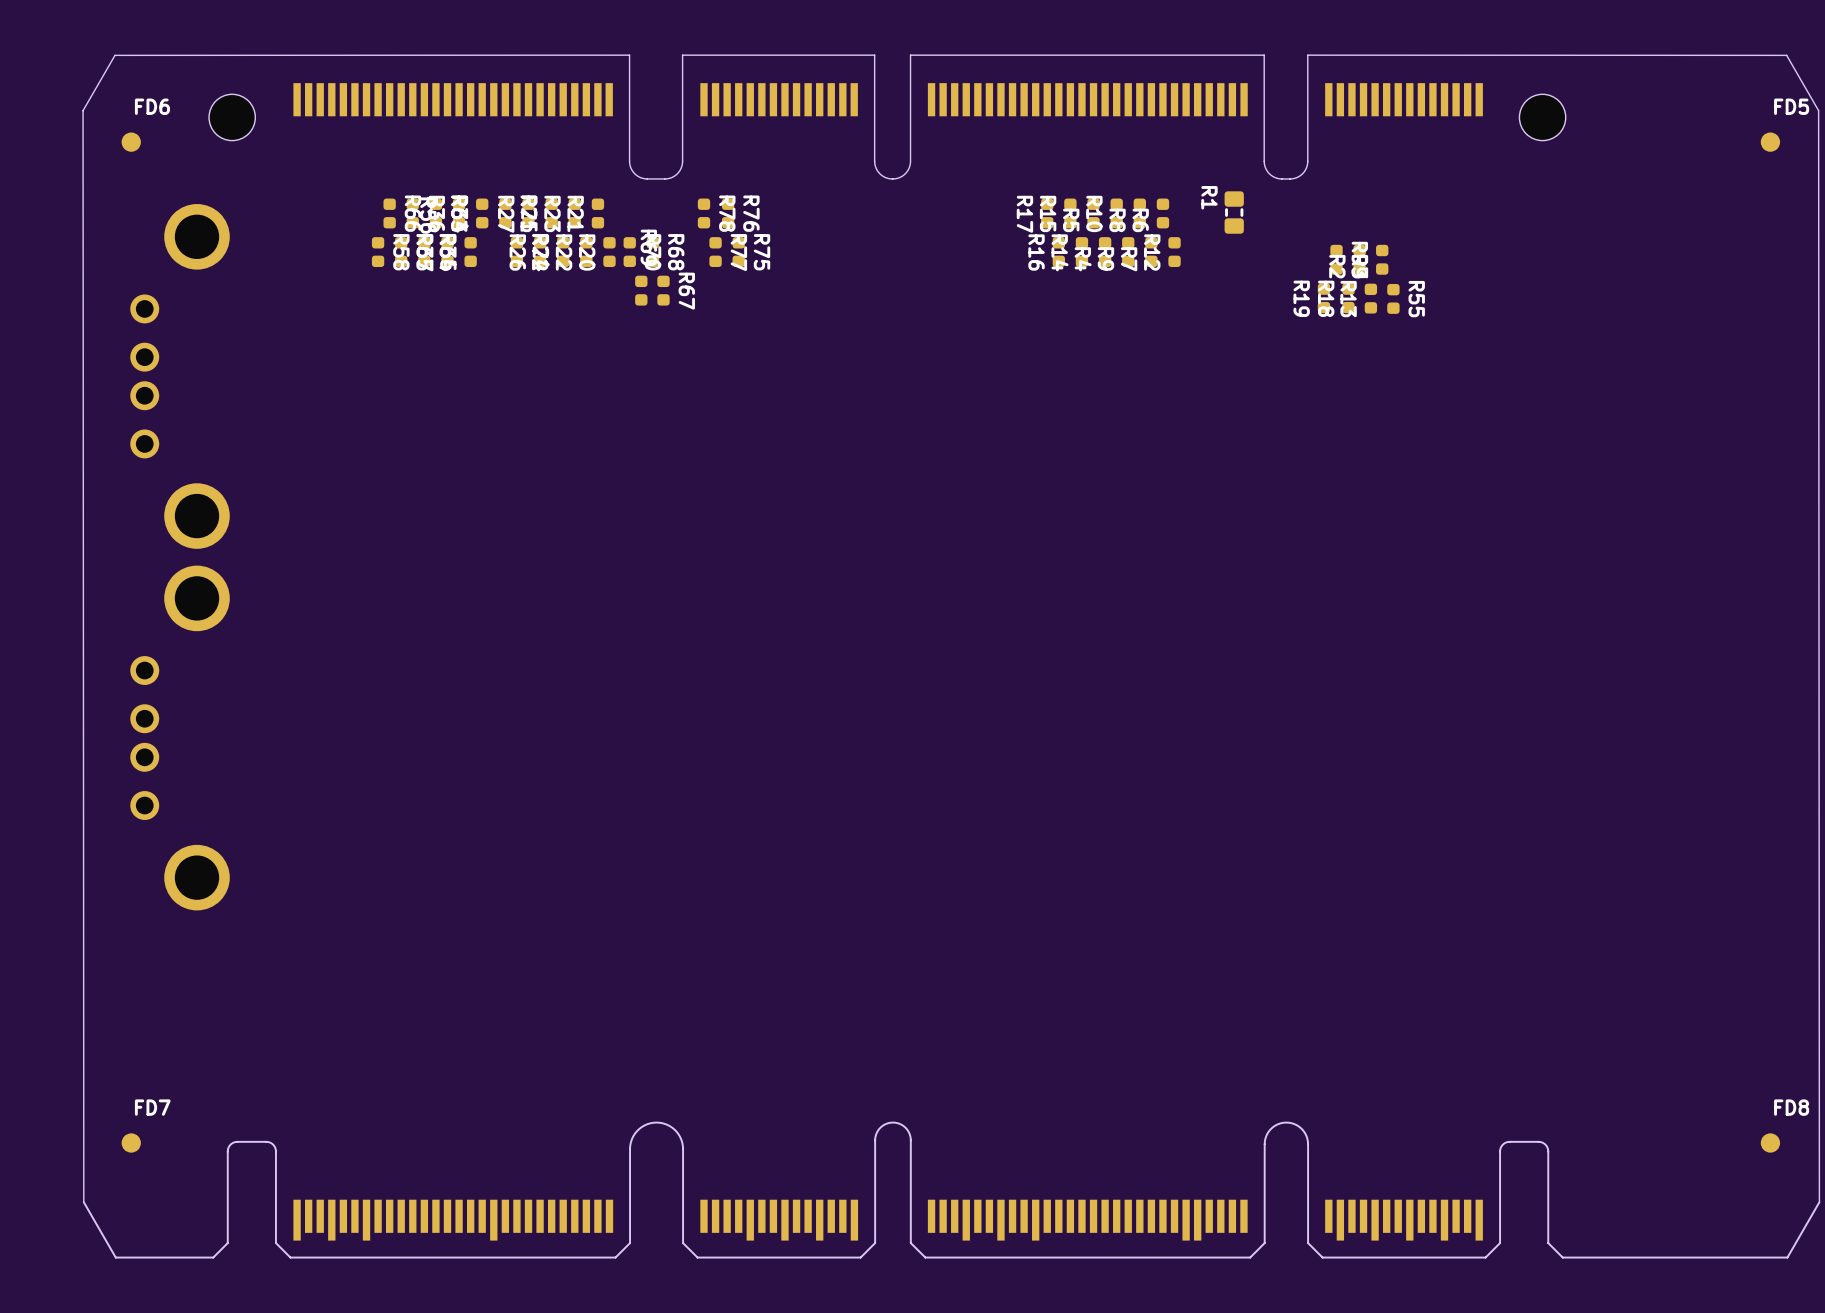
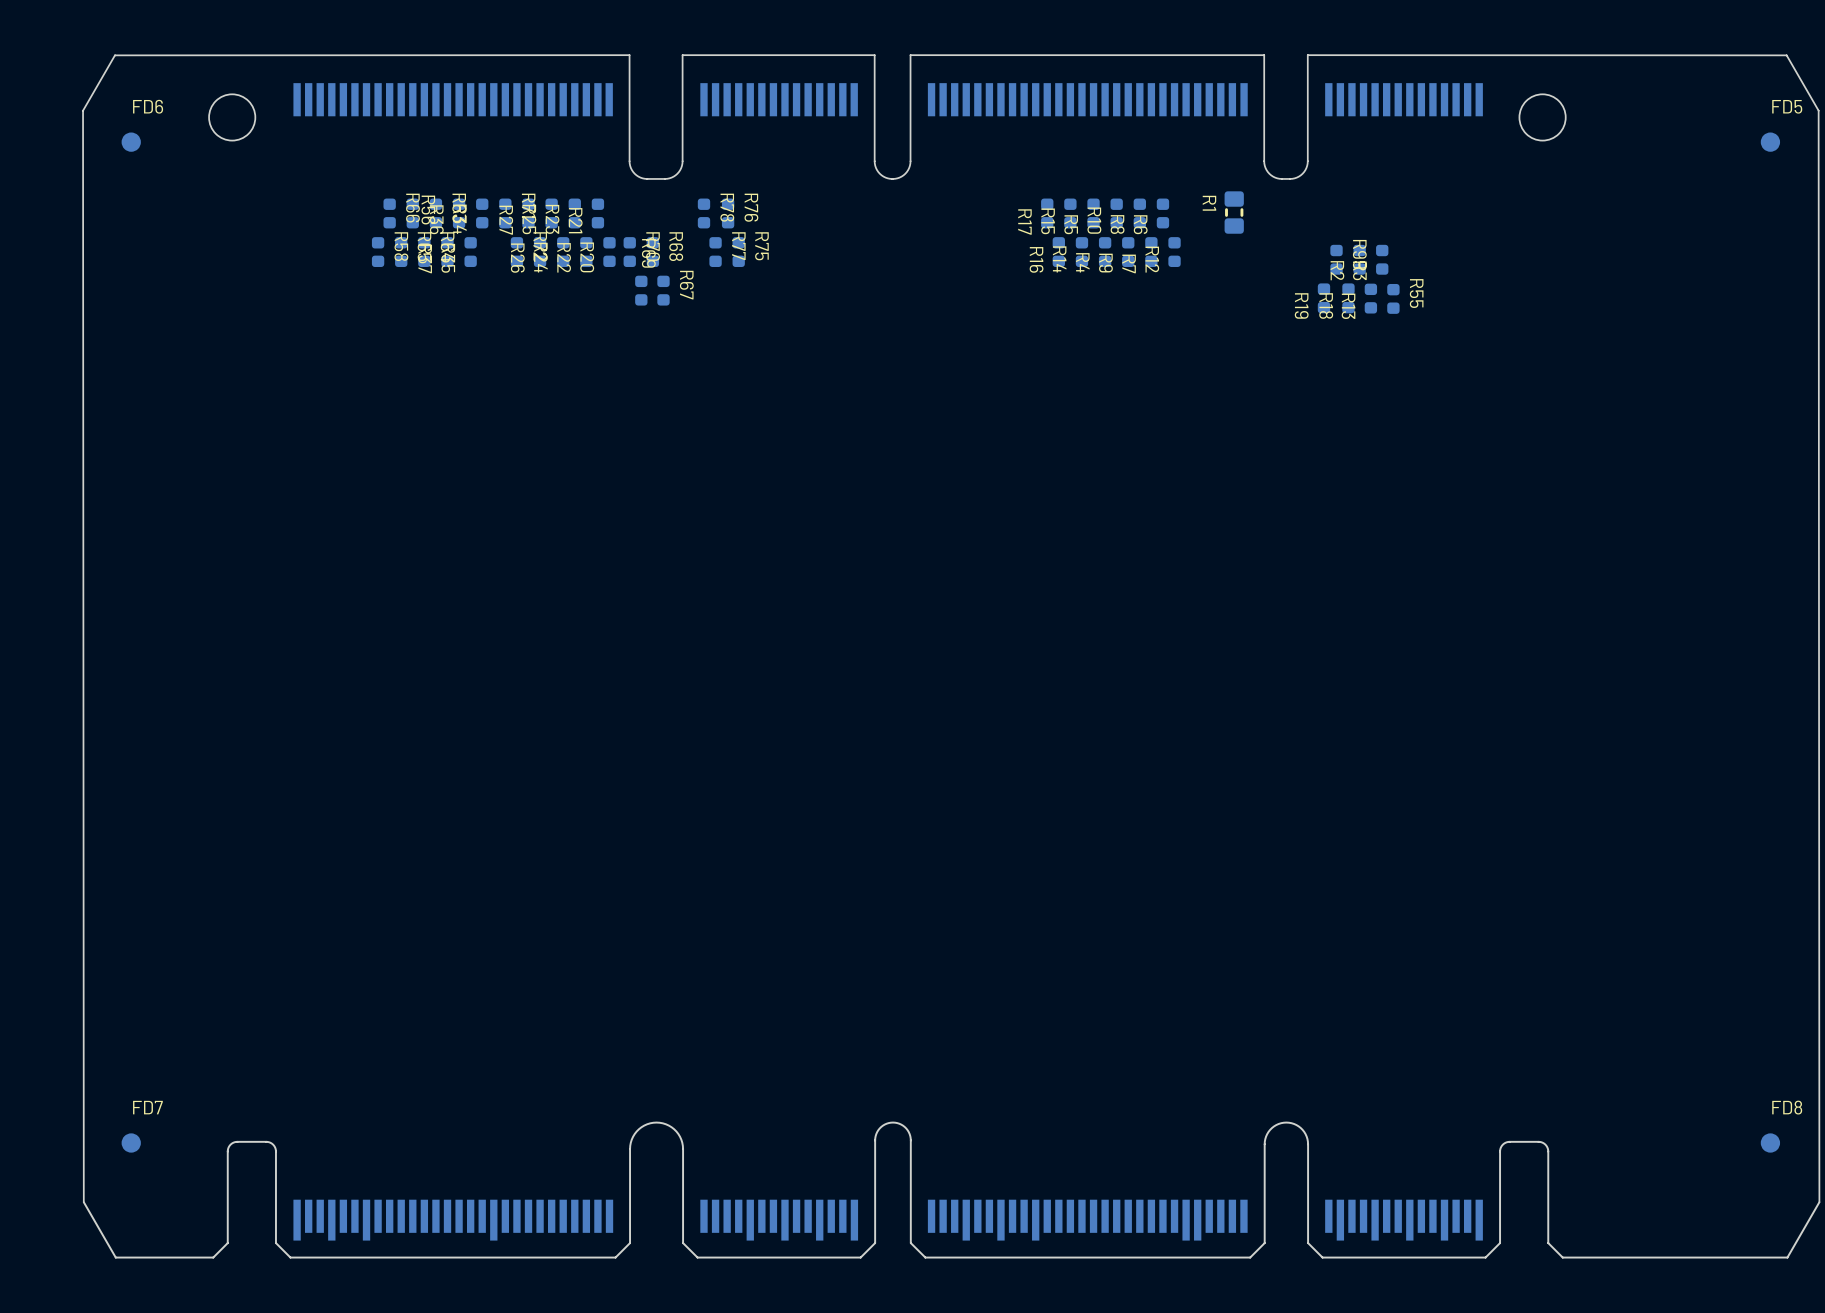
part: (180, 376) -> none
part: (180, 738) -> none

